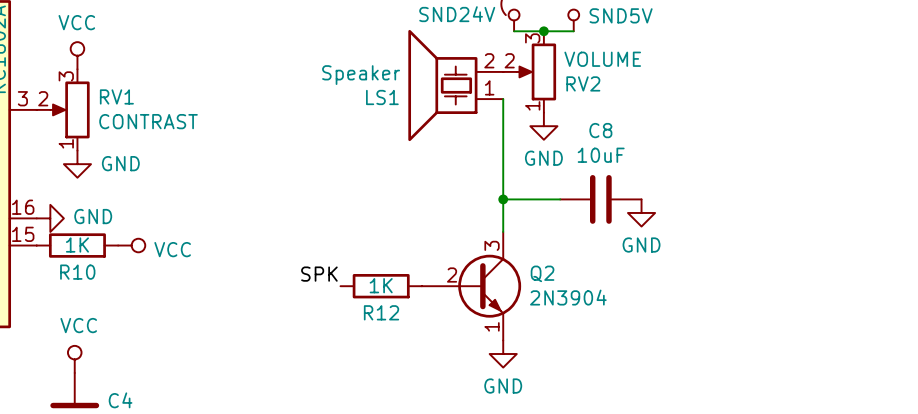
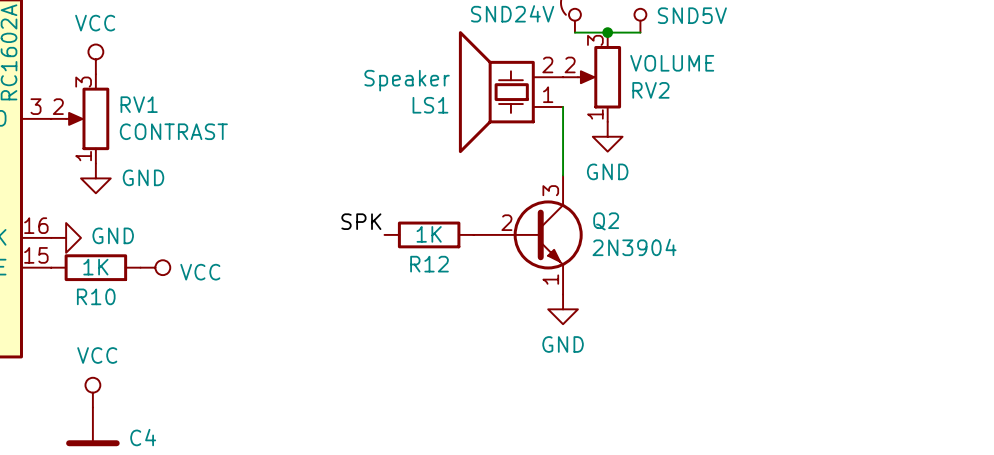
wire: (503, 161) (503, 231) -> none
wire: (503, 199) (560, 199) -> none
junction: (503, 199) -> none
C8: 10uF (600, 199) -> none
power symbol: GND (641, 212) -> none
label position: SPK (319, 274) -> SPK (361, 221)
R12 position: (381, 286) -> (429, 234)
Q2 position: (471, 286) -> (528, 234)
power symbol position: GND (503, 354) -> GND (563, 309)

